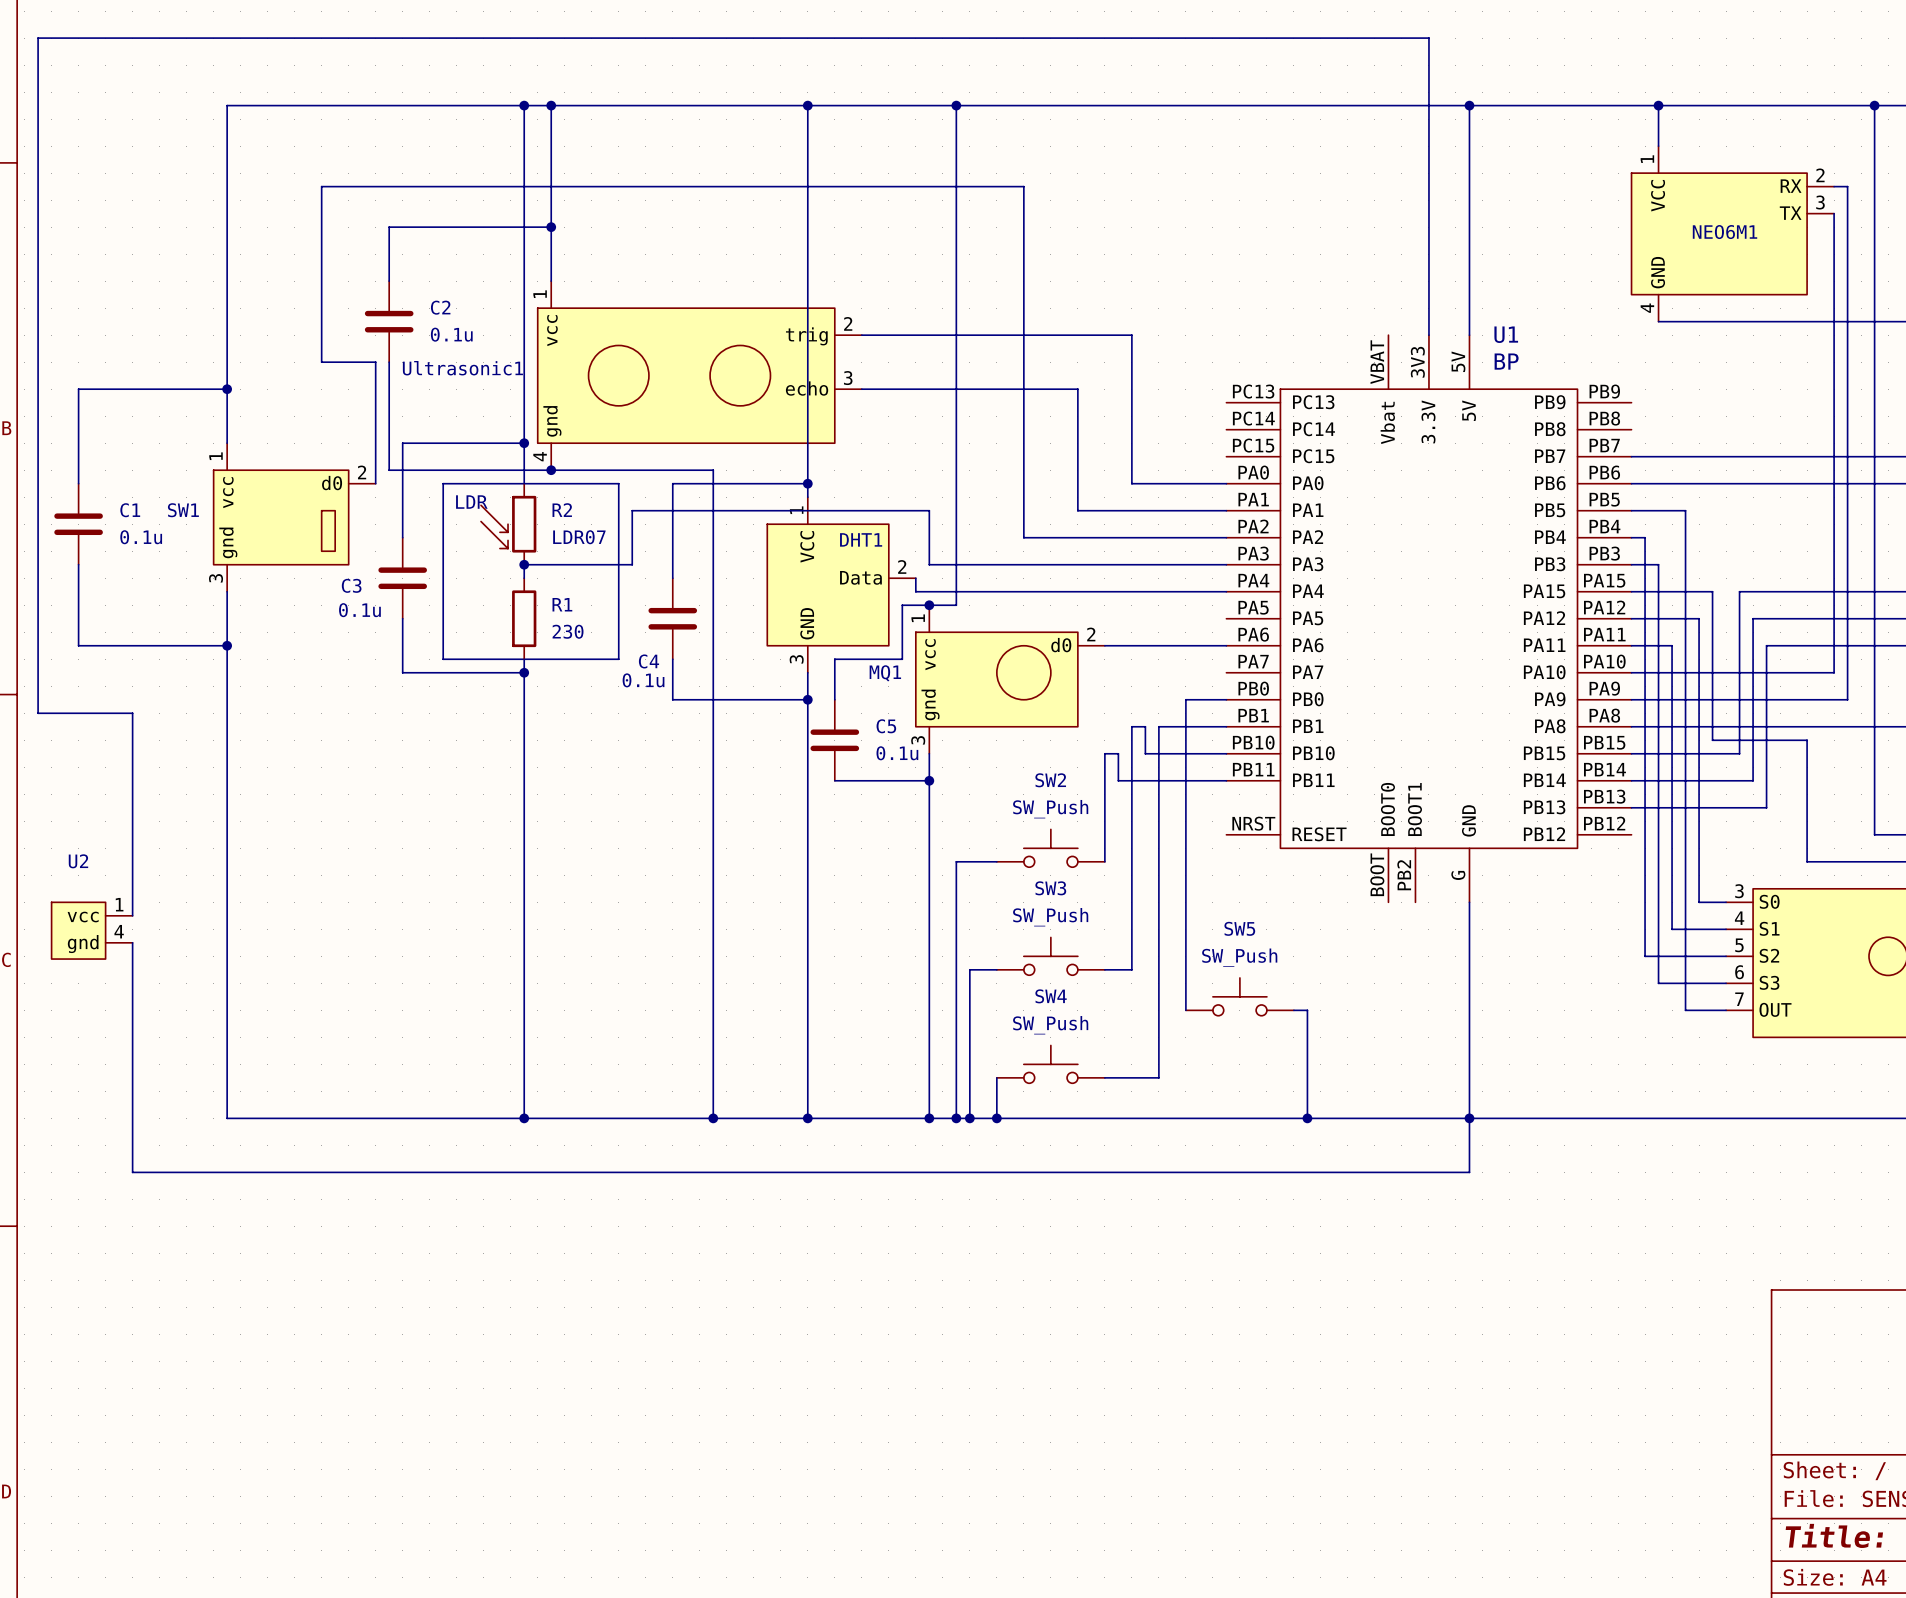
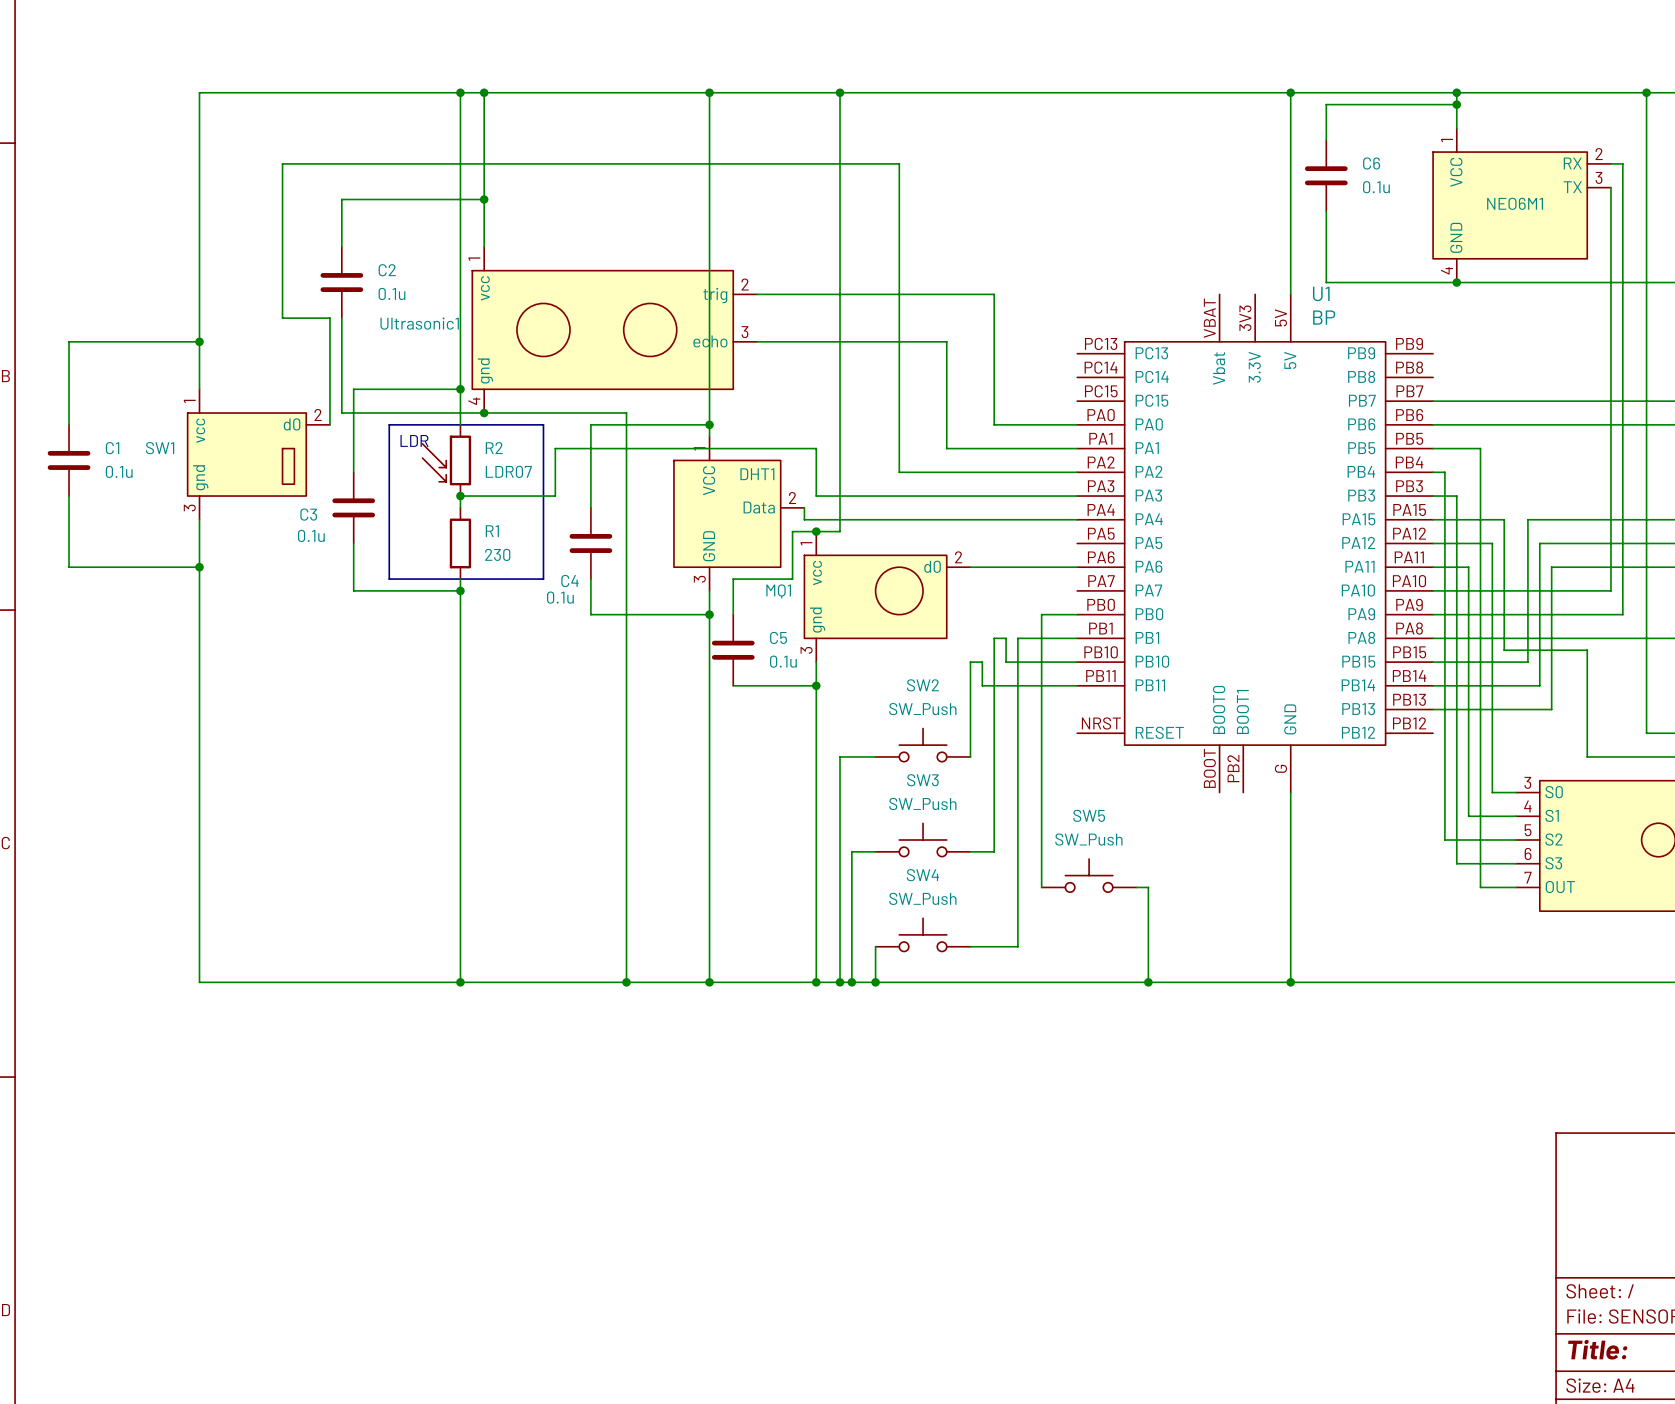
wire: none -> (1456, 104) (1326, 104) (1326, 140)
junction: none -> (1456, 104)
C6: none -> 0.1u (1326, 175)
wire: none -> (1326, 211) (1326, 282) (1456, 282)
junction: none -> (1456, 282)
wire: (1428, 335) (1428, 38) (38, 38) (38, 713) (132, 713) (132, 915) -> none
U2: (92, 930) -> none
wire: (132, 942) (132, 1172) (1469, 1172) (1469, 1118) -> none

